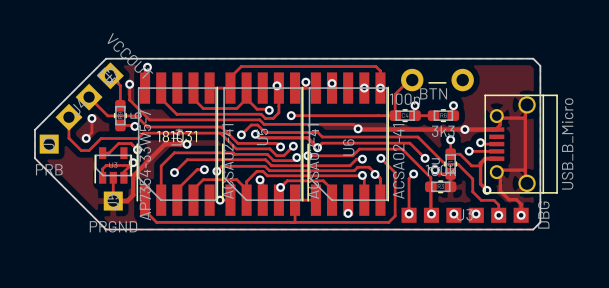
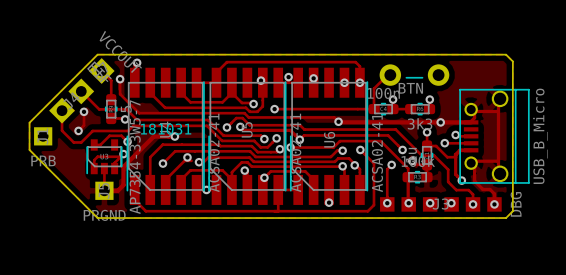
via: none -> (187, 157)
via: (204, 169) -> none
via: none -> (199, 162)
via: (216, 171) -> none

